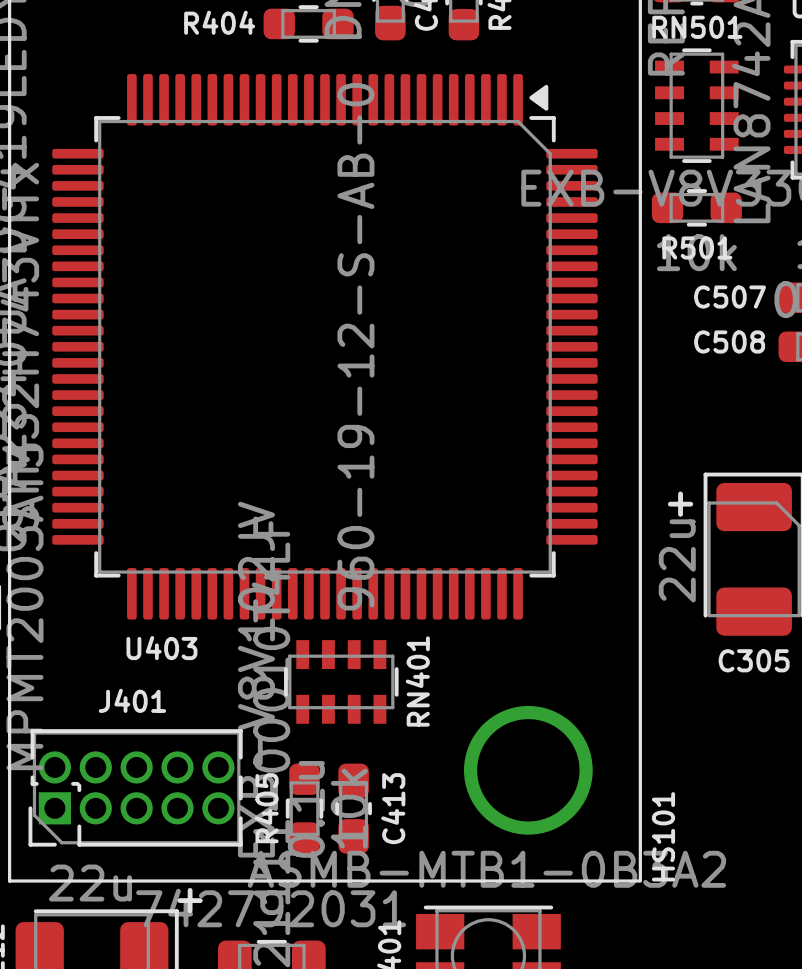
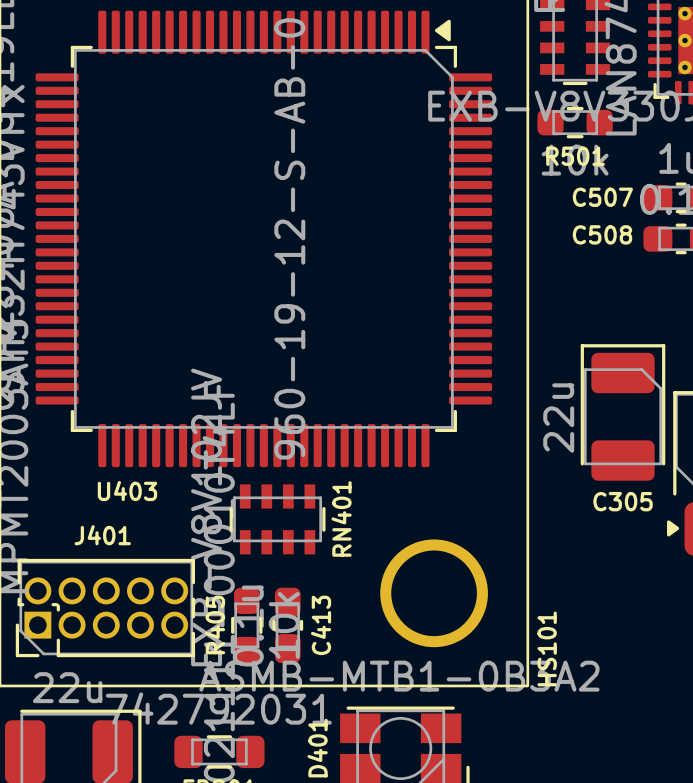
line: (680, 493) (680, 514) -> none
line: (670, 504) (690, 504) -> none
line: (190, 890) (190, 910) -> none
line: (179, 900) (200, 900) -> none

